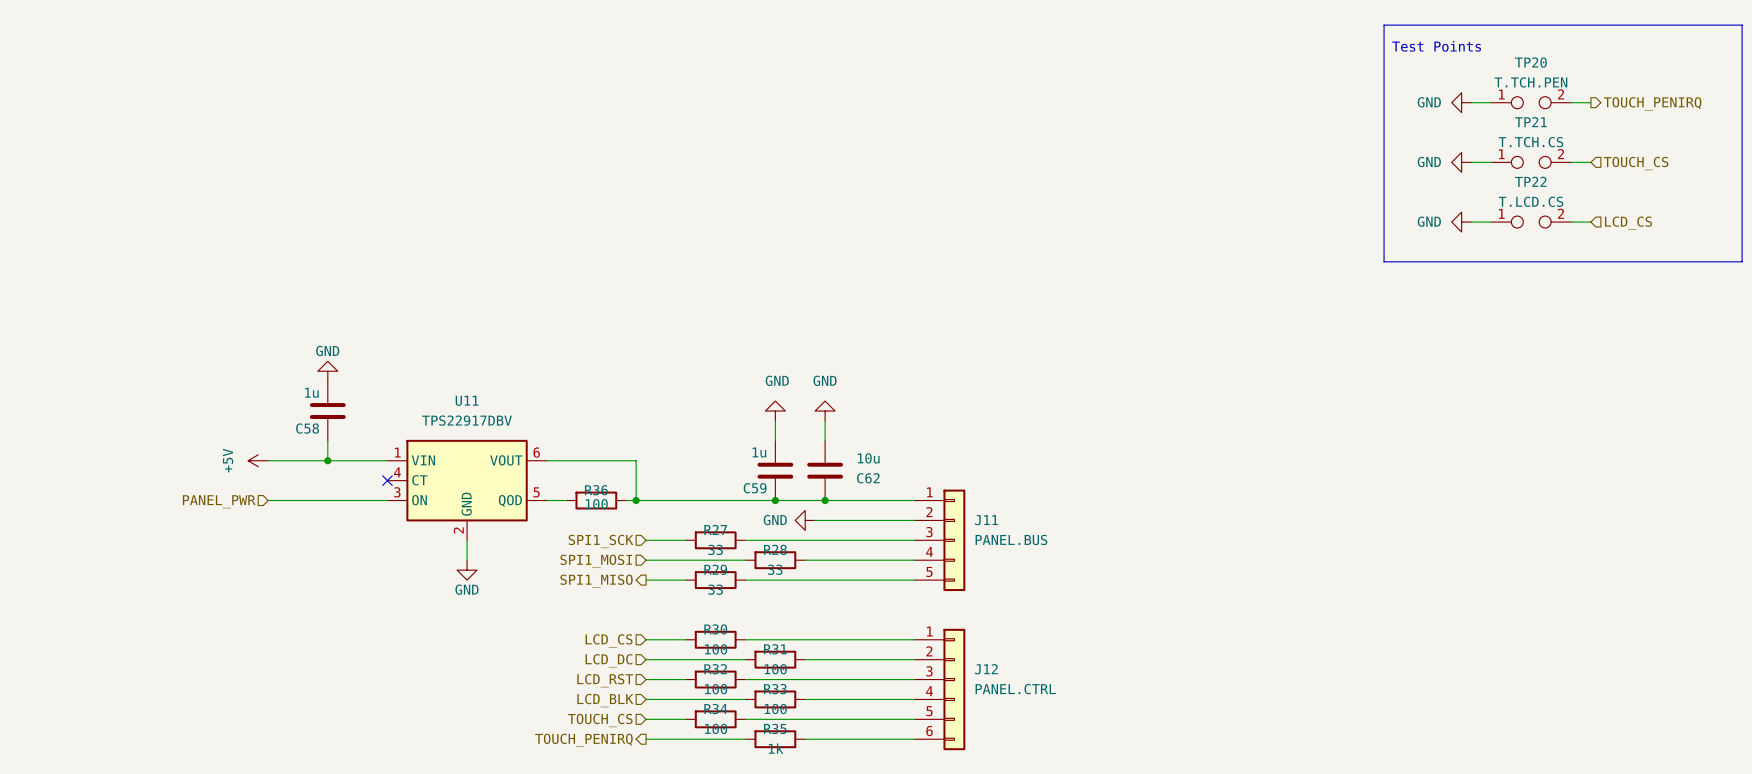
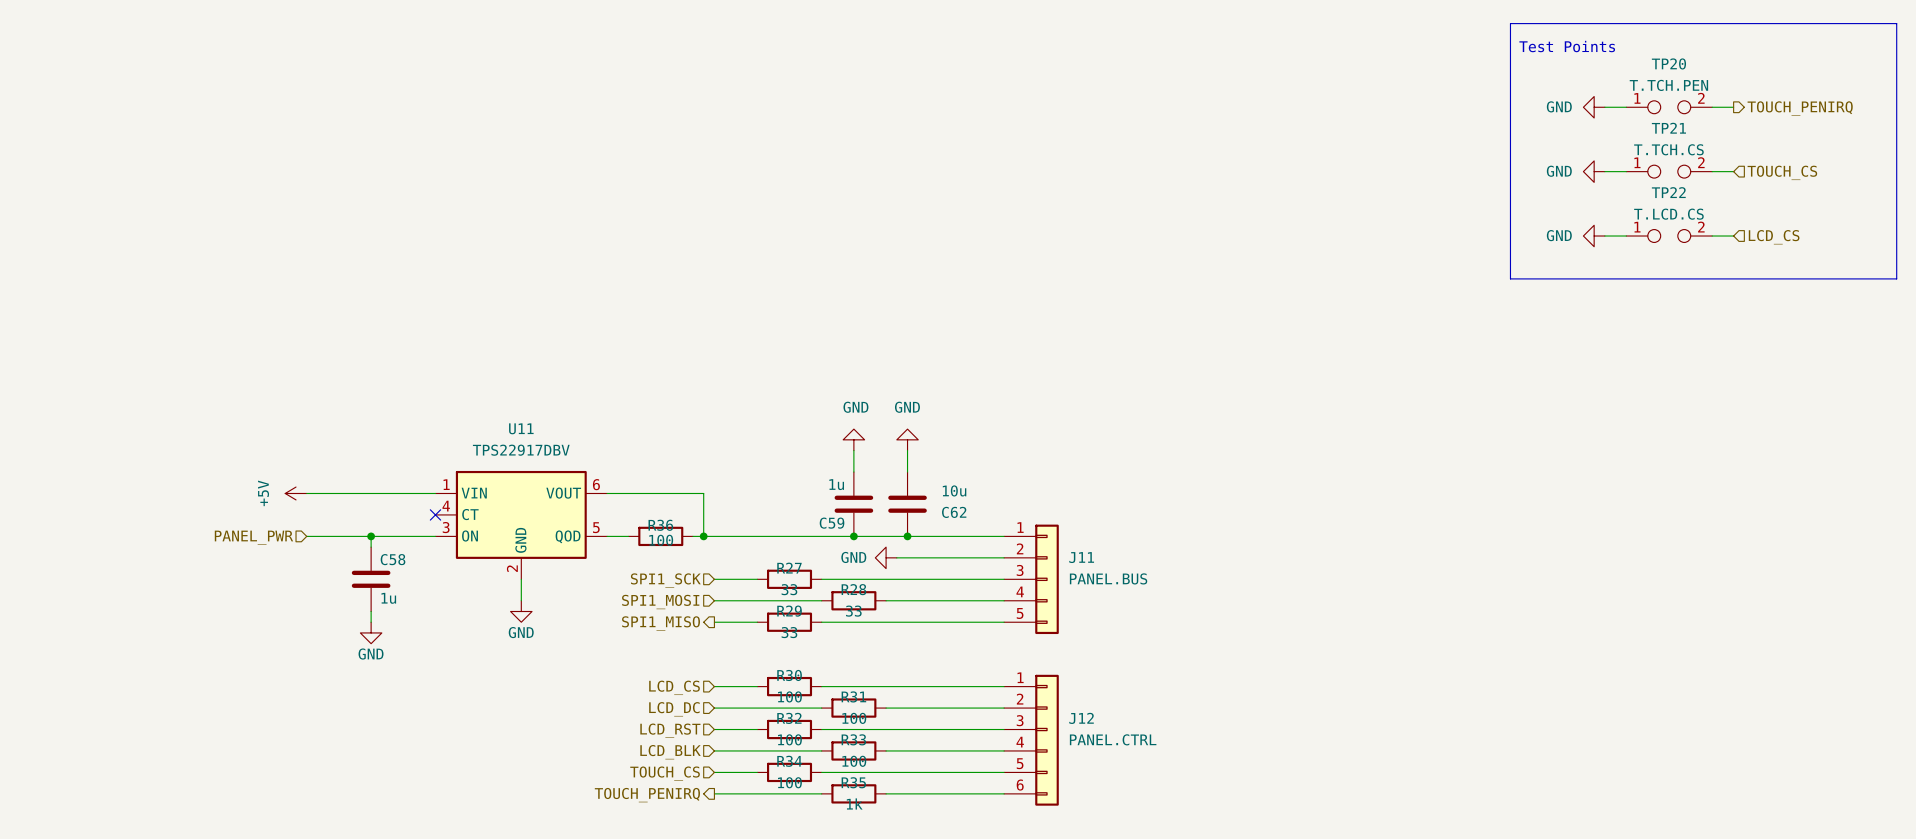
power symbol: GND (327, 371) -> none
C58 value position: 1u (311, 392) -> 1u (388, 598)
C58 position: (327, 411) -> (371, 579)
C58 name position: C58 (307, 428) -> C58 (393, 559)
wire: (327, 440) (327, 460) -> none
junction position: (327, 460) -> (371, 536)
wire: none -> (371, 536) (371, 547)
wire: none -> (371, 611) (371, 622)
power symbol: none -> GND (371, 632)

